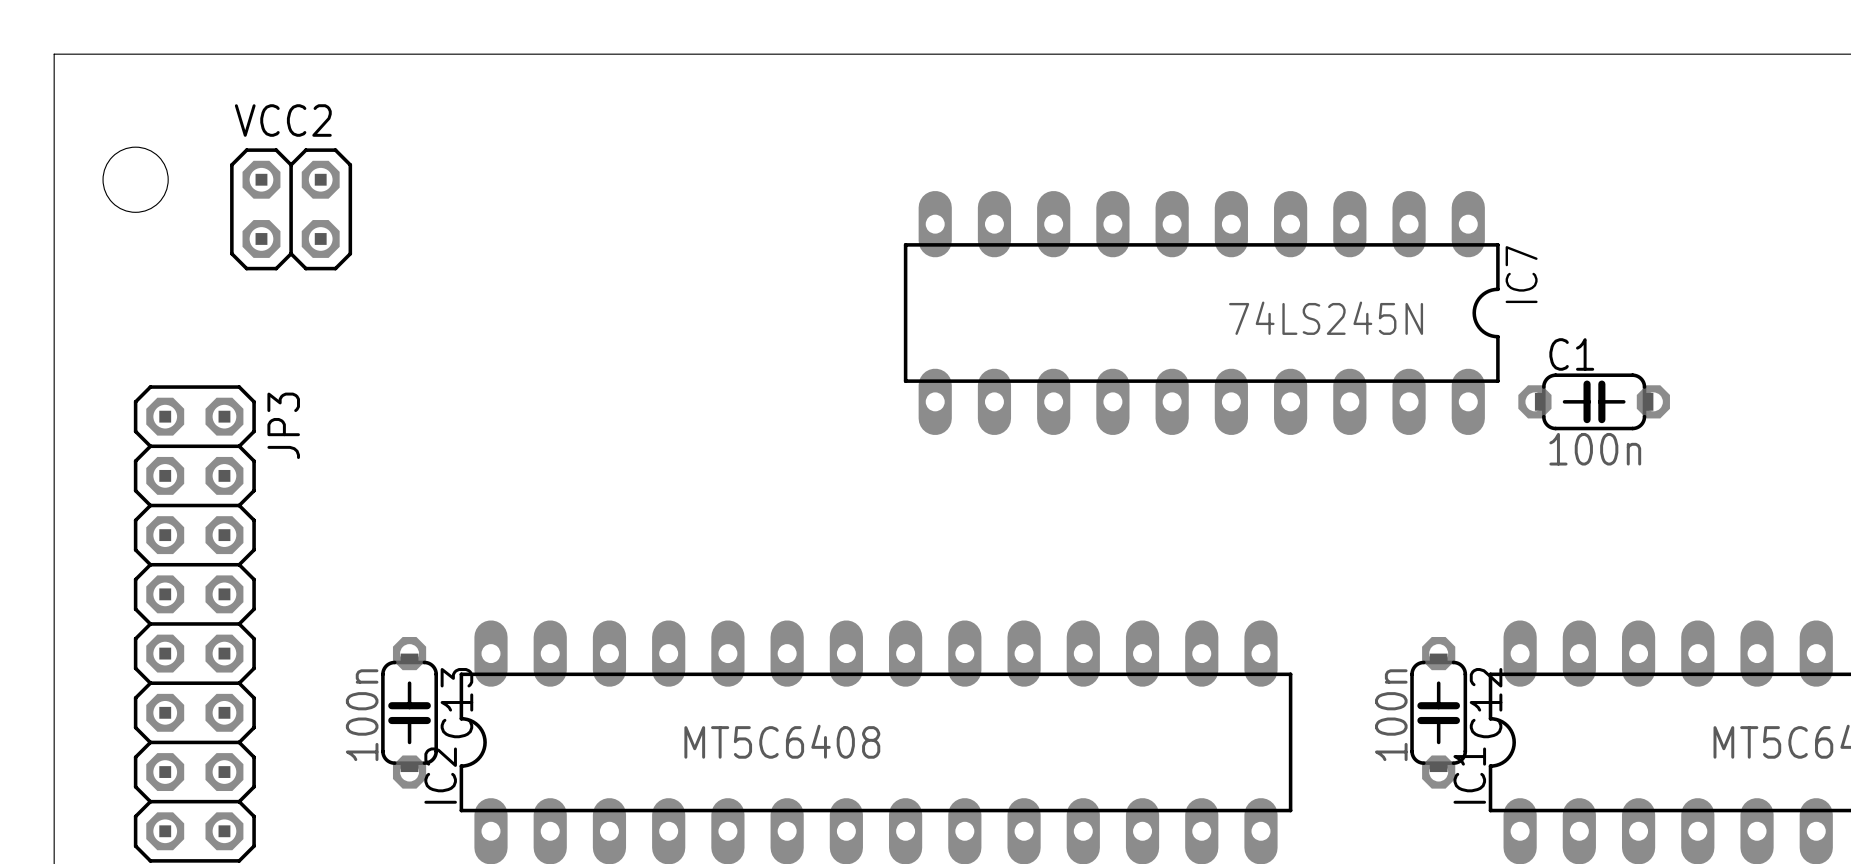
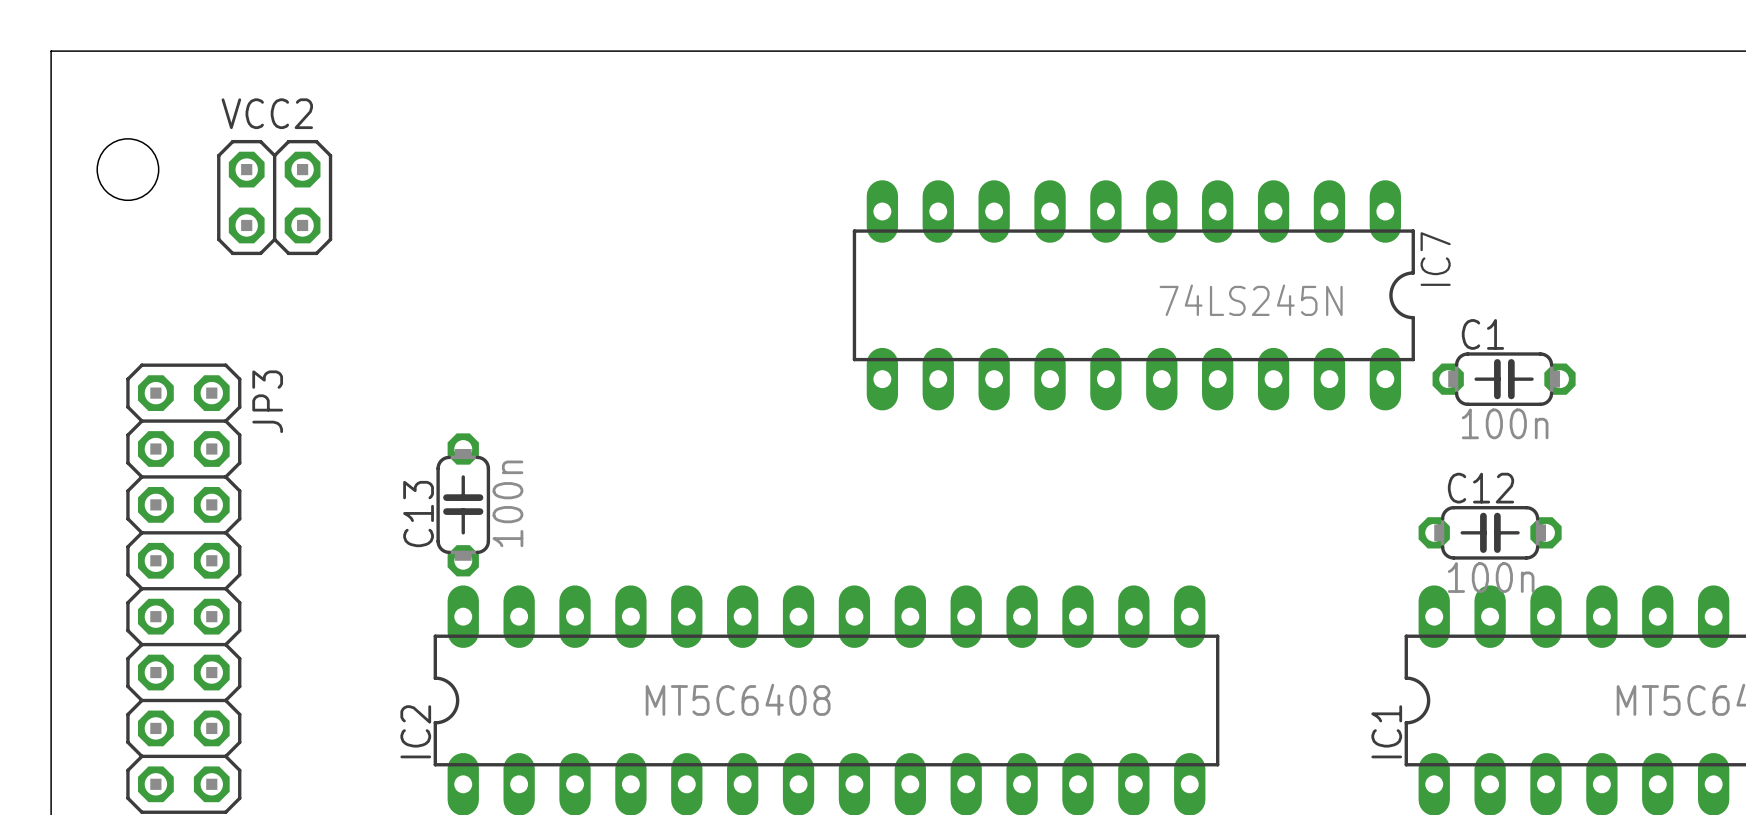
C13 rotation: 0° (409, 712) -> 180° (463, 504)
C13 position: (409, 712) -> (463, 504)
C12 rotation: 0° (1438, 712) -> 90° counterclockwise (1490, 532)
C12 position: (1438, 712) -> (1490, 532)

